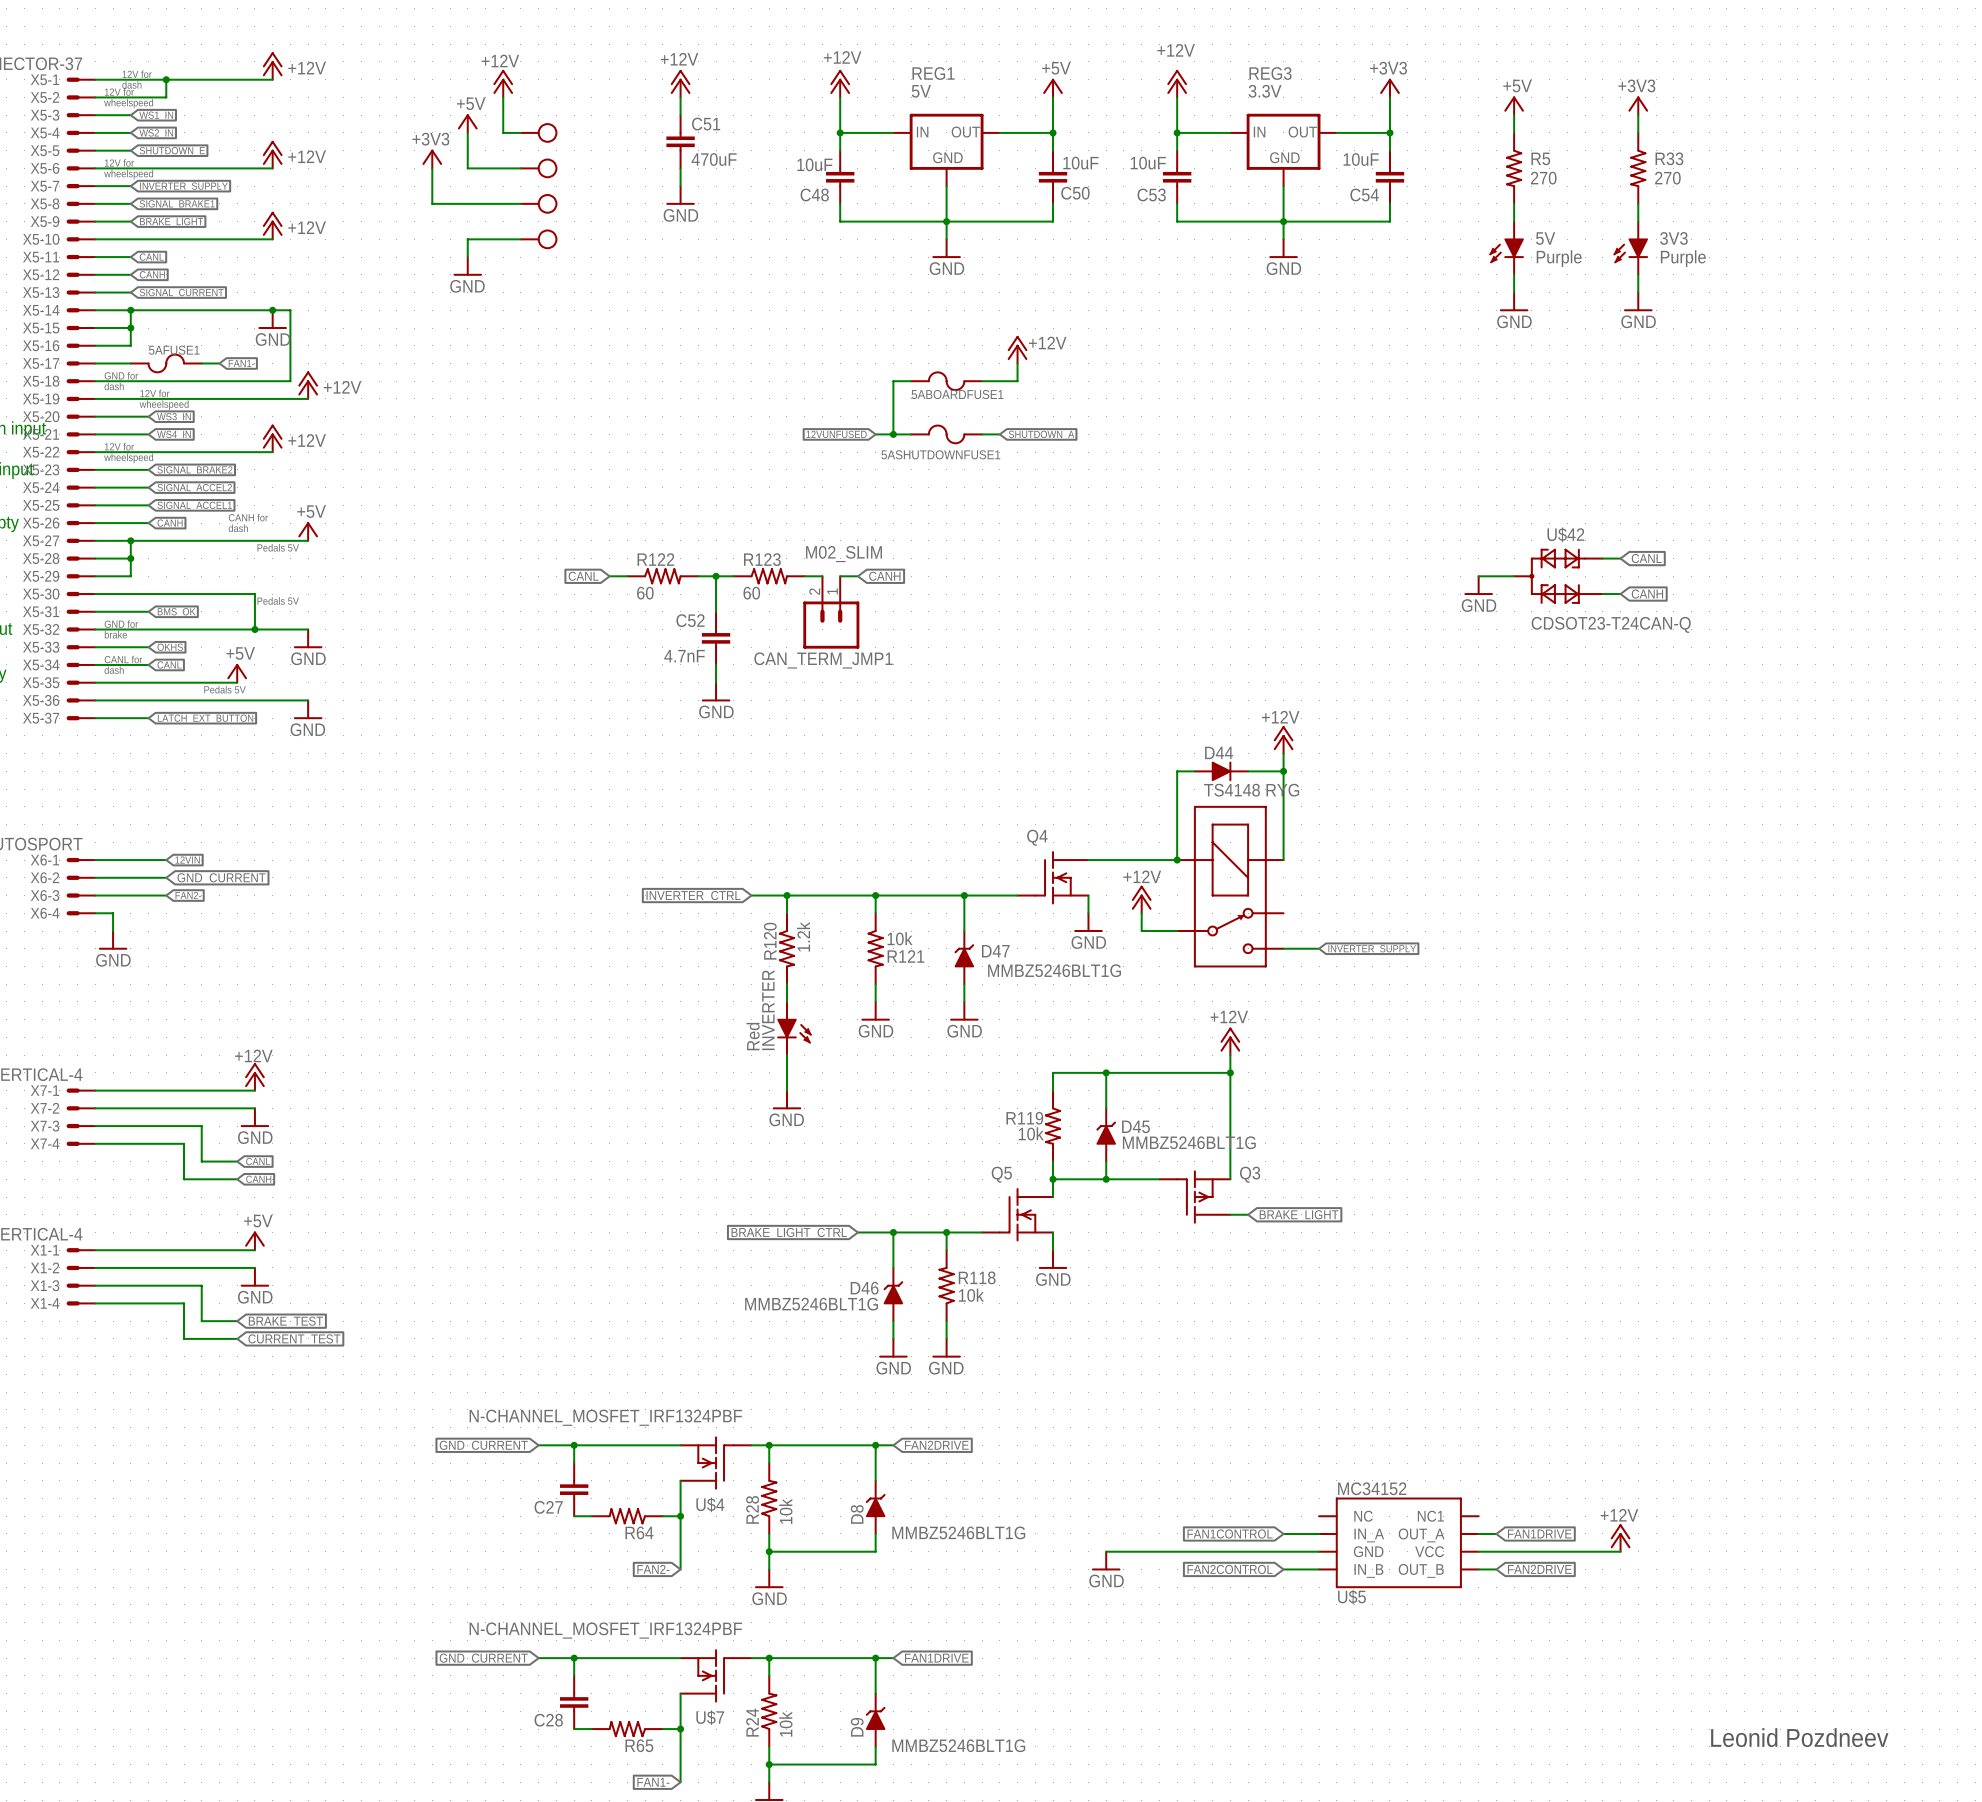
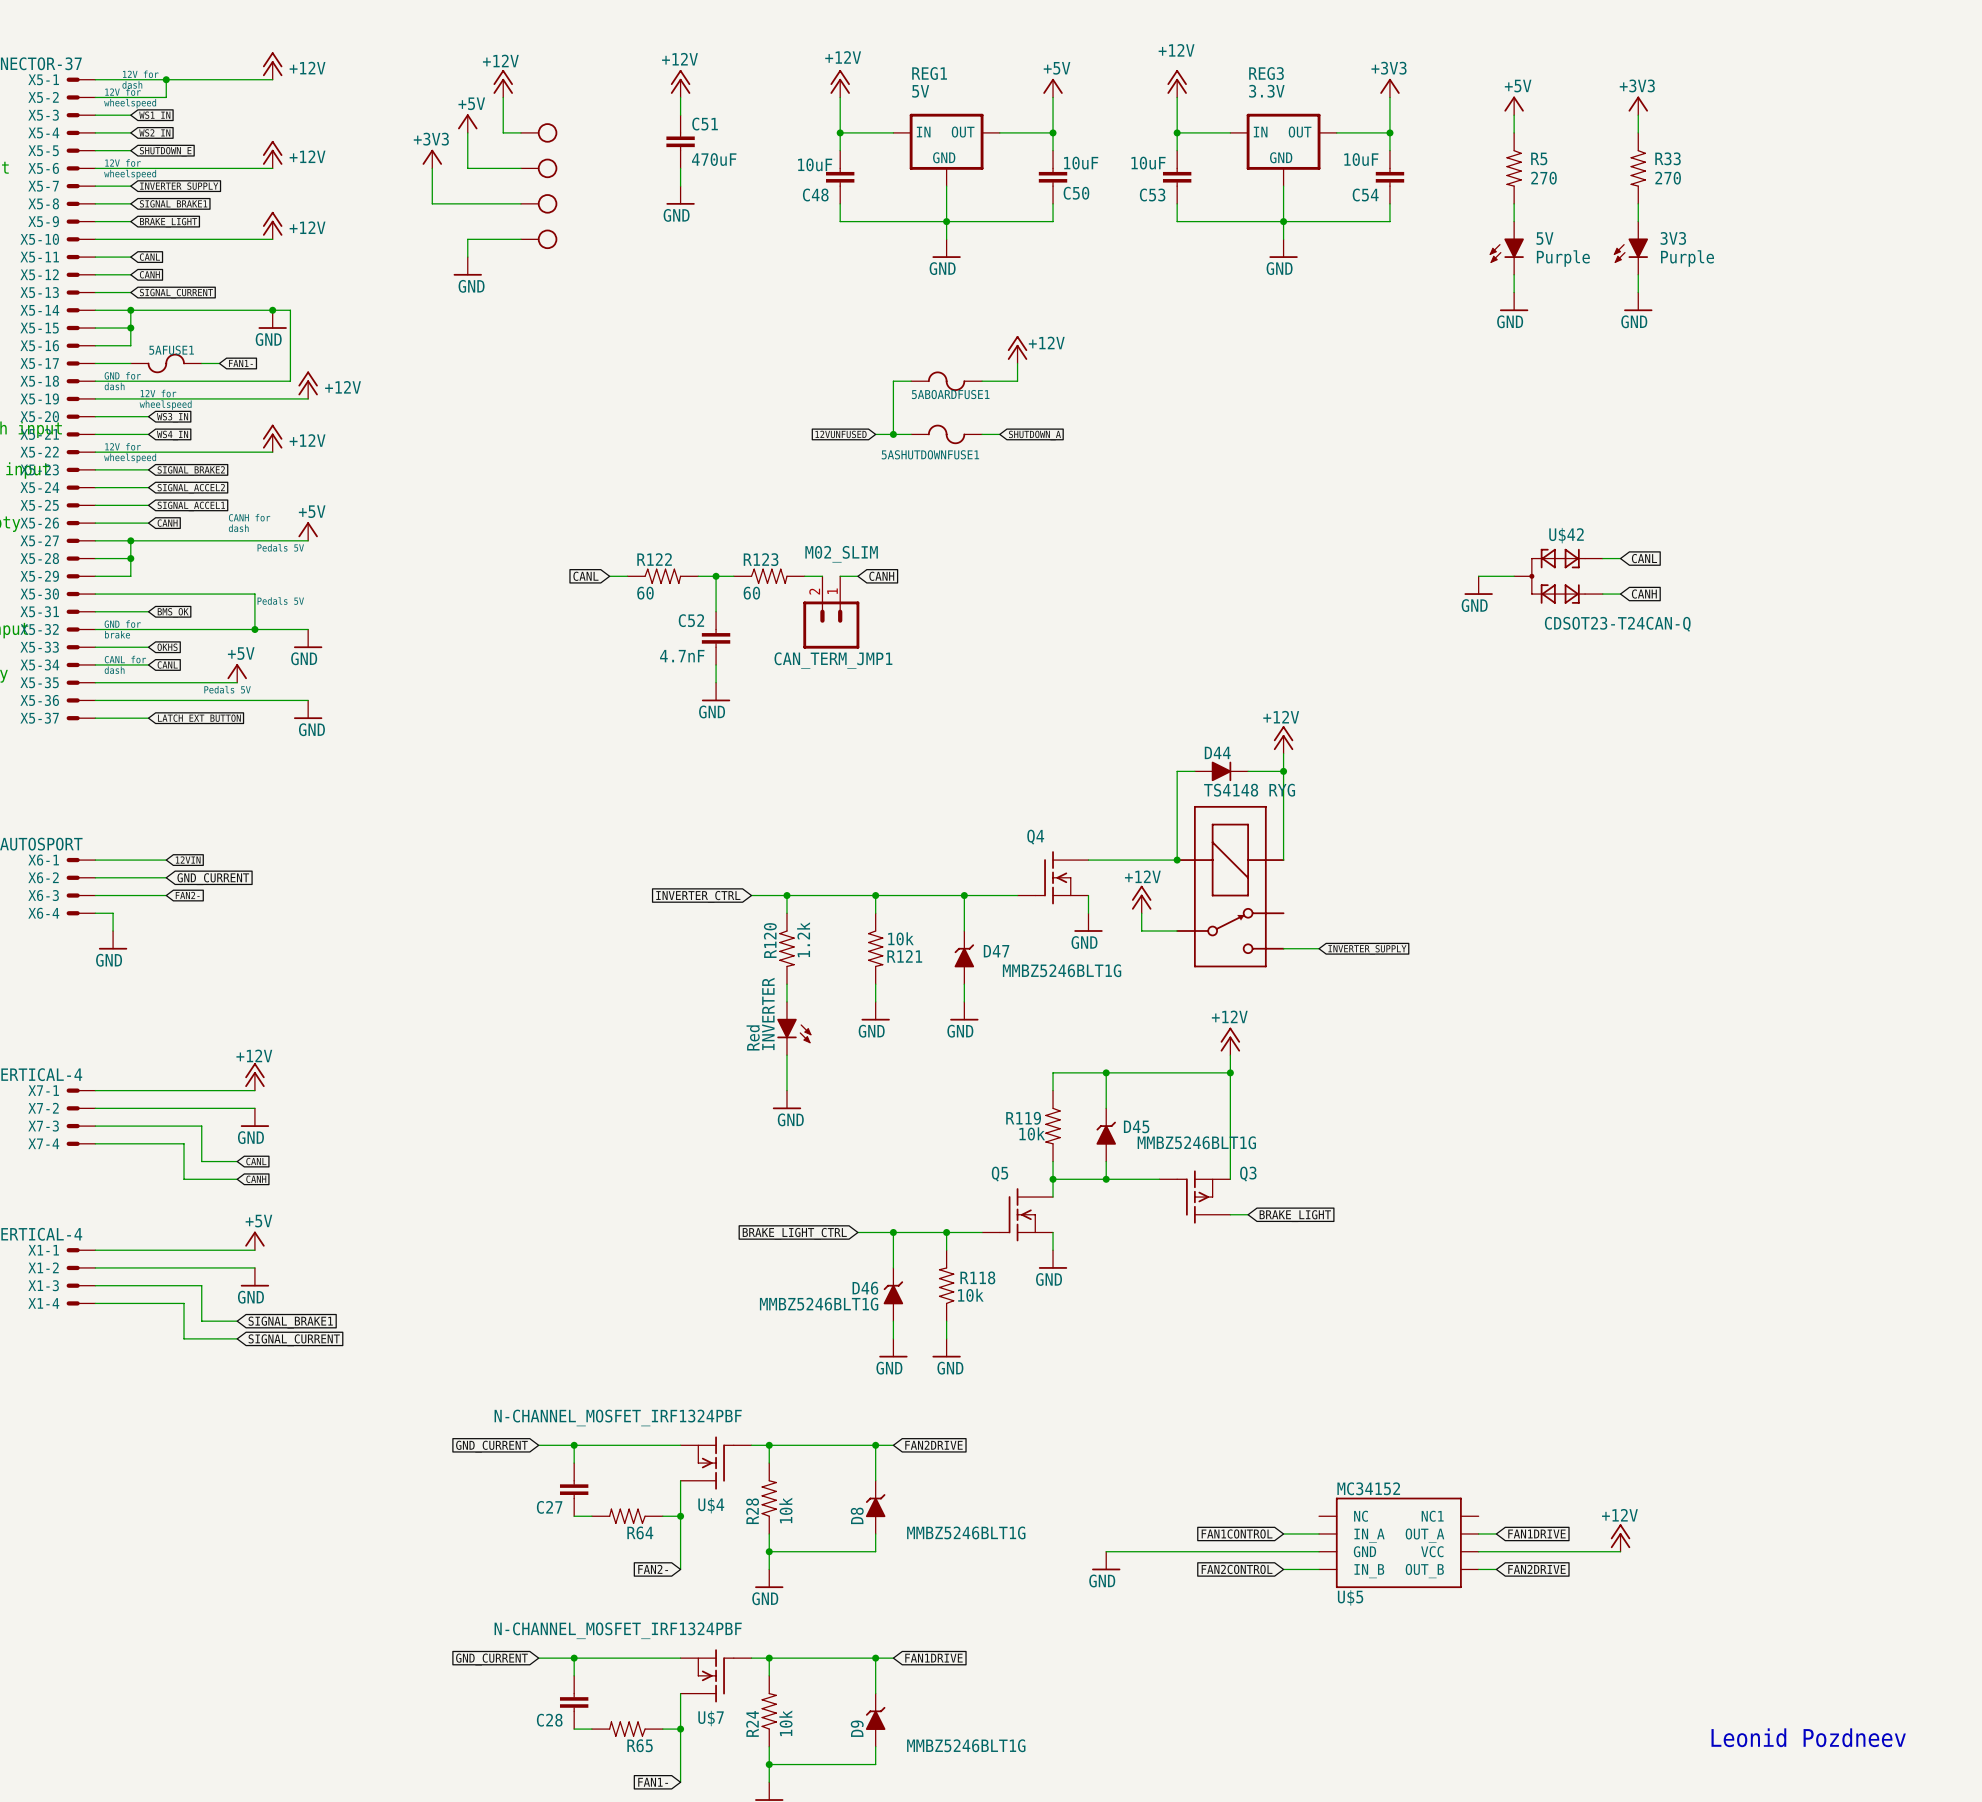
global label: BRAKE_TEST (285, 1322) -> SIGNAL_BRAKE1 (290, 1322)
global label: CURRENT_TEST (294, 1340) -> SIGNAL_CURRENT (294, 1340)

